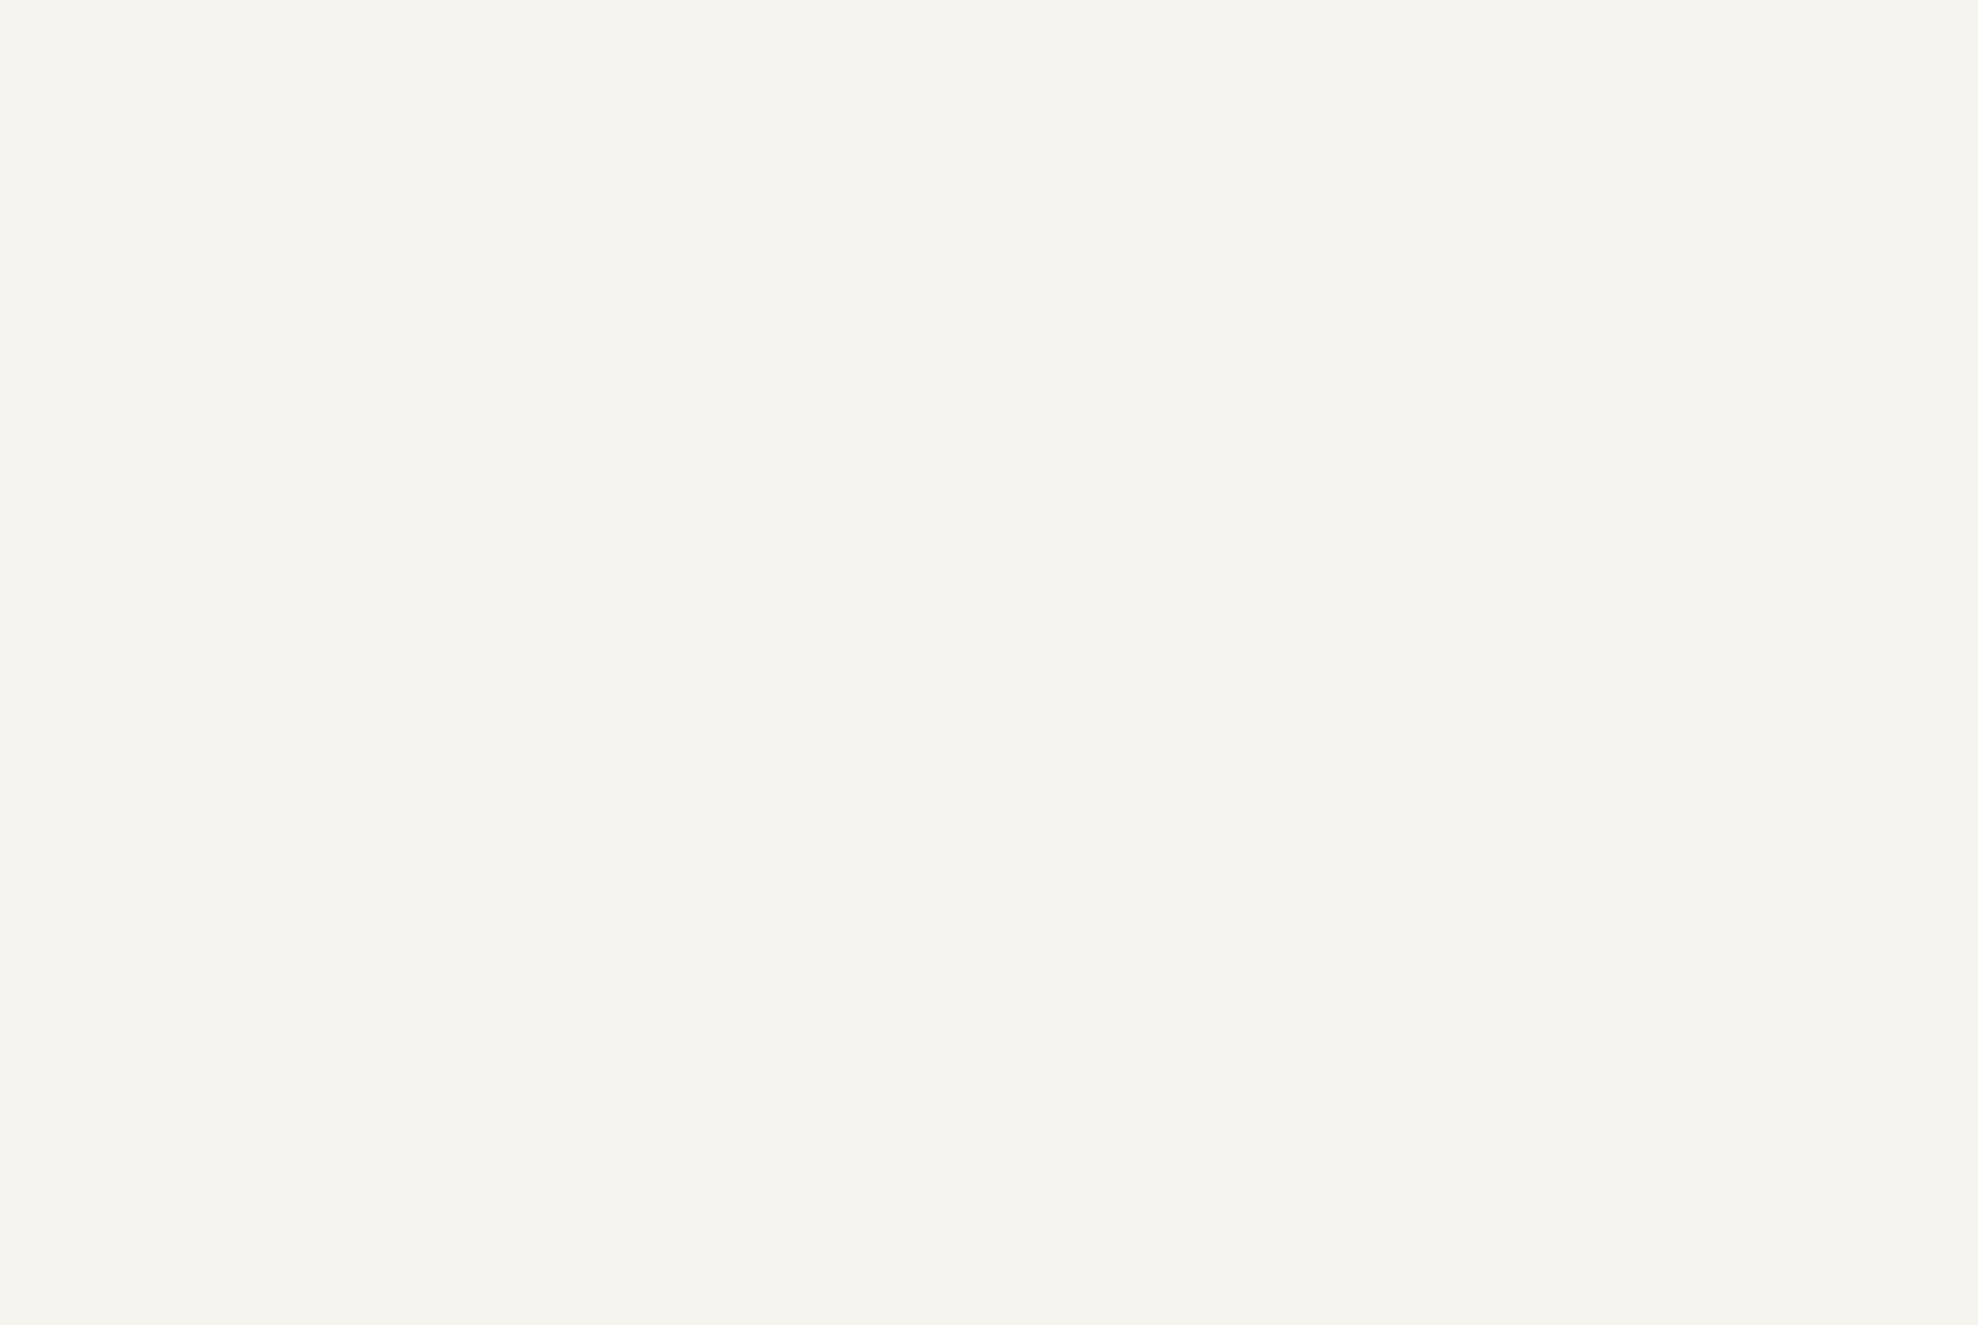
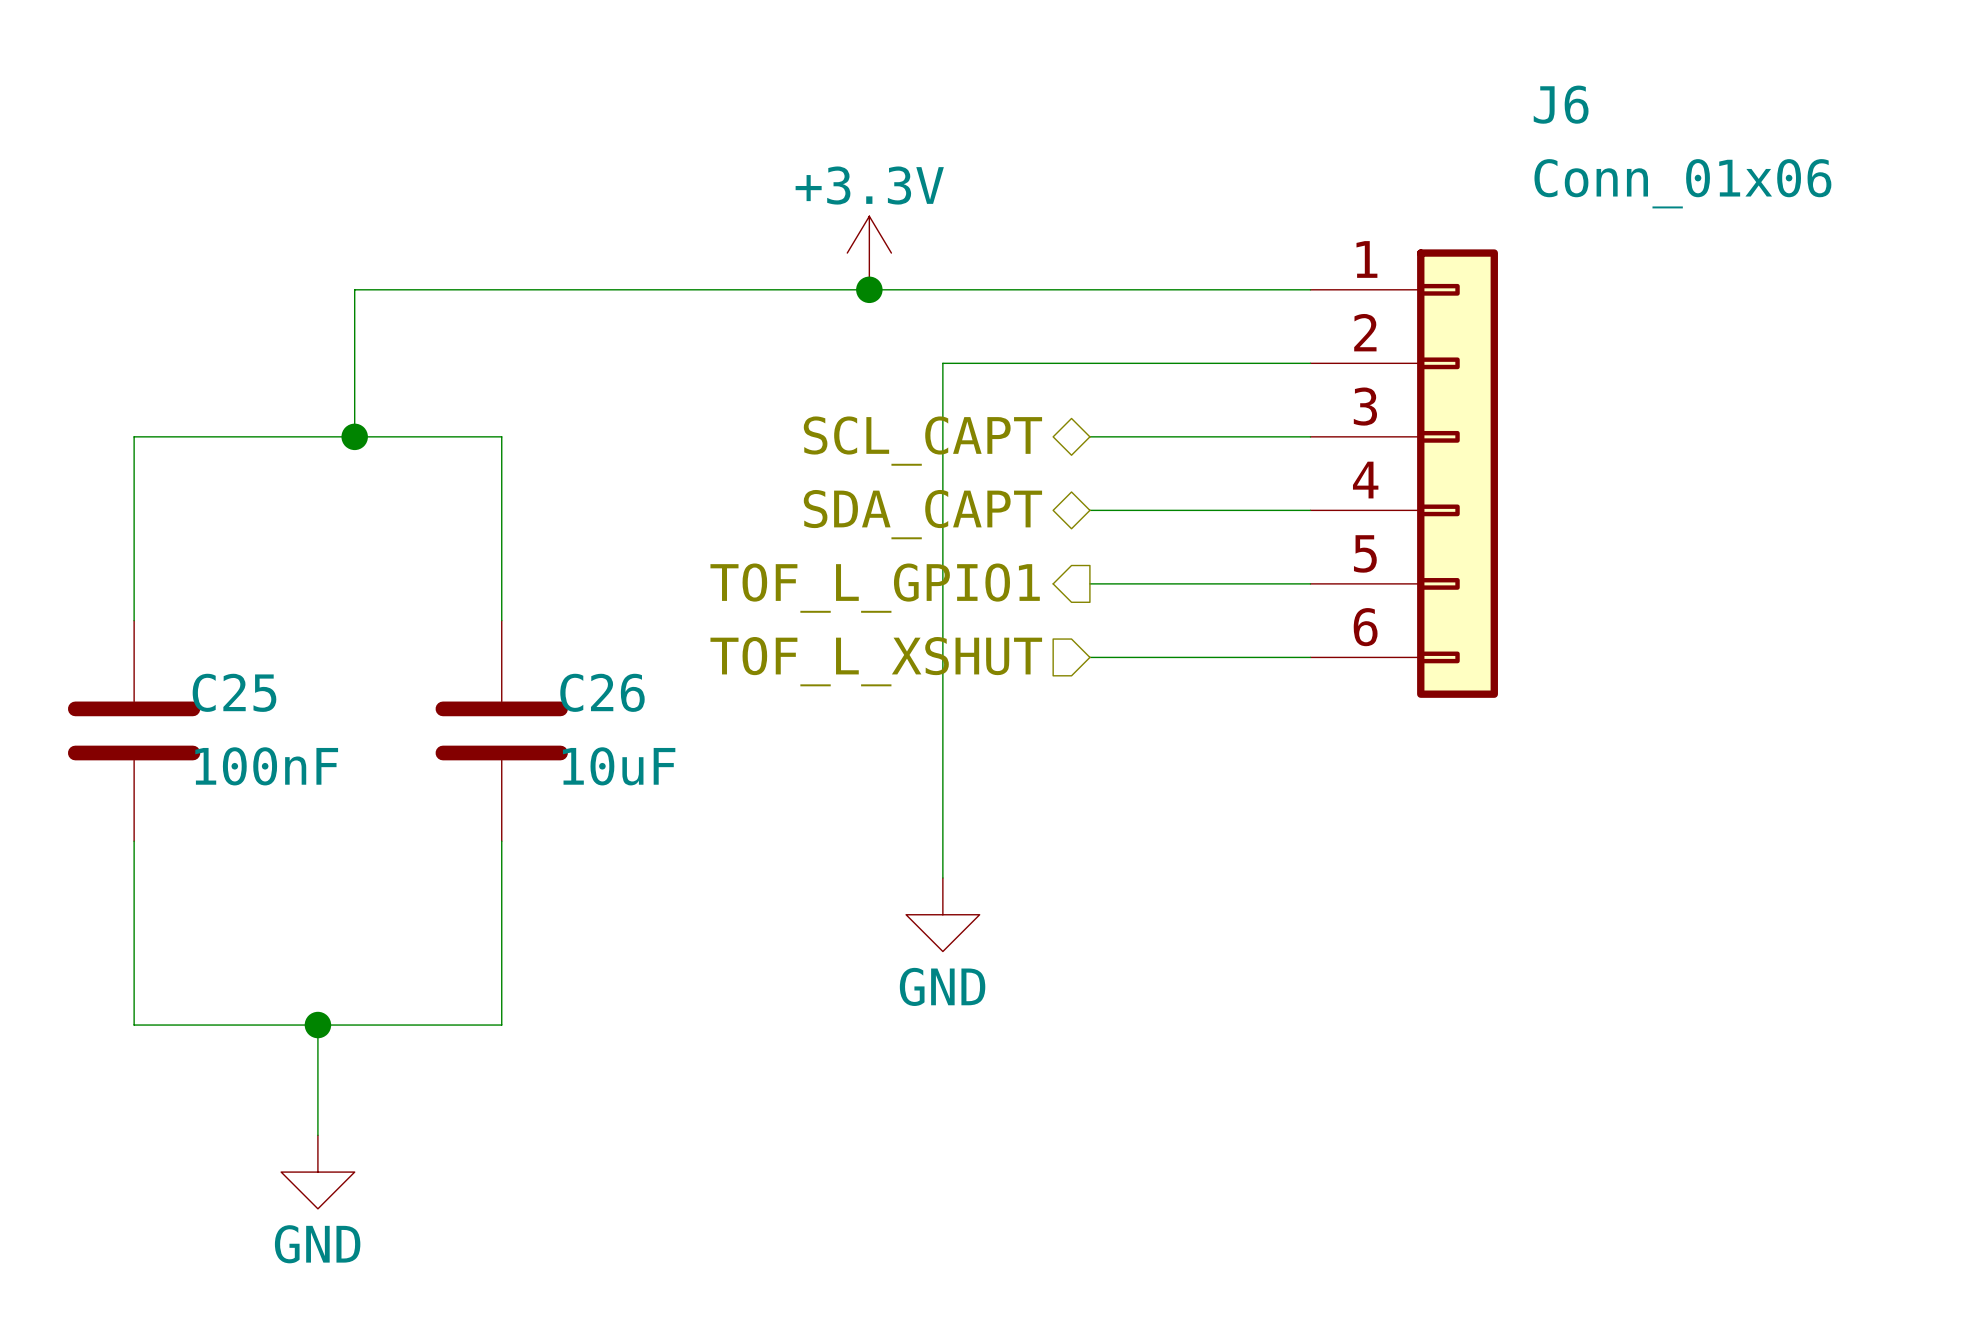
power symbol: none -> +3.3V (869, 253)
junction: none -> (869, 289)
wire: none -> (1310, 289) (354, 289) (354, 436)
wire: none -> (1310, 363) (942, 363) (942, 877)
junction: none -> (354, 436)
wire: none -> (1089, 436) (1310, 436)
hierarchical label: none -> SCL_CAPT (922, 441)
J6: none -> Conn_01x06 (1404, 473)
hierarchical label: none -> SDA_CAPT (922, 514)
wire: none -> (1089, 510) (1310, 510)
wire: none -> (1089, 583) (1310, 583)
hierarchical label: none -> TOF_L_GPIO1 (875, 588)
wire: none -> (134, 620) (134, 436) (501, 436) (501, 620)
hierarchical label: none -> TOF_L_XSHUT (876, 661)
wire: none -> (1089, 657) (1310, 657)
C25: none -> 100nF (134, 730)
C26: none -> 10uF (501, 730)
wire: none -> (134, 841) (134, 1025) (501, 1025) (501, 841)
power symbol: none -> GND (942, 914)
wire: none -> (317, 1025) (317, 1135)
junction: none -> (317, 1025)
power symbol: none -> GND (317, 1172)

